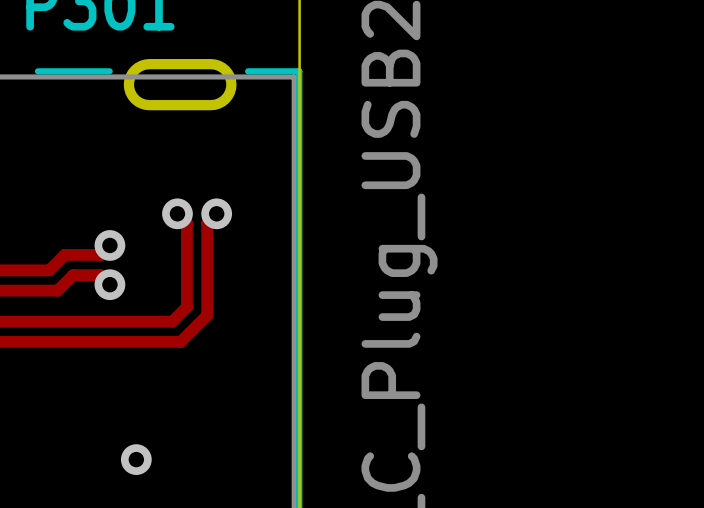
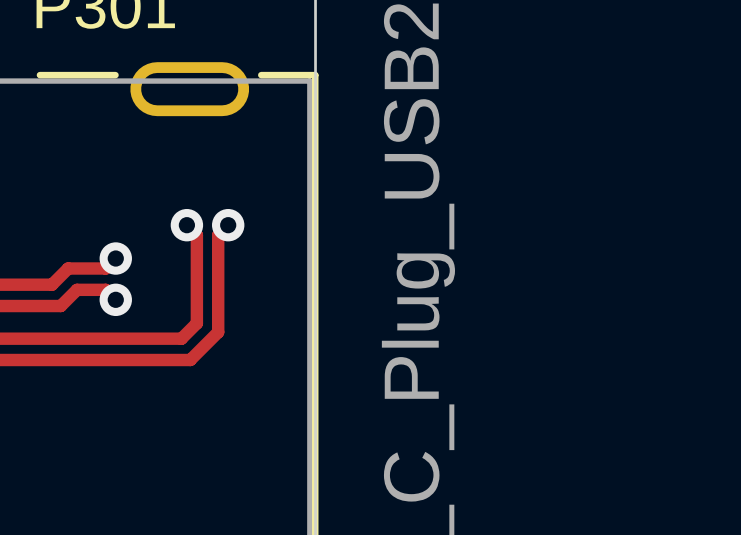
via: (136, 459) -> none

